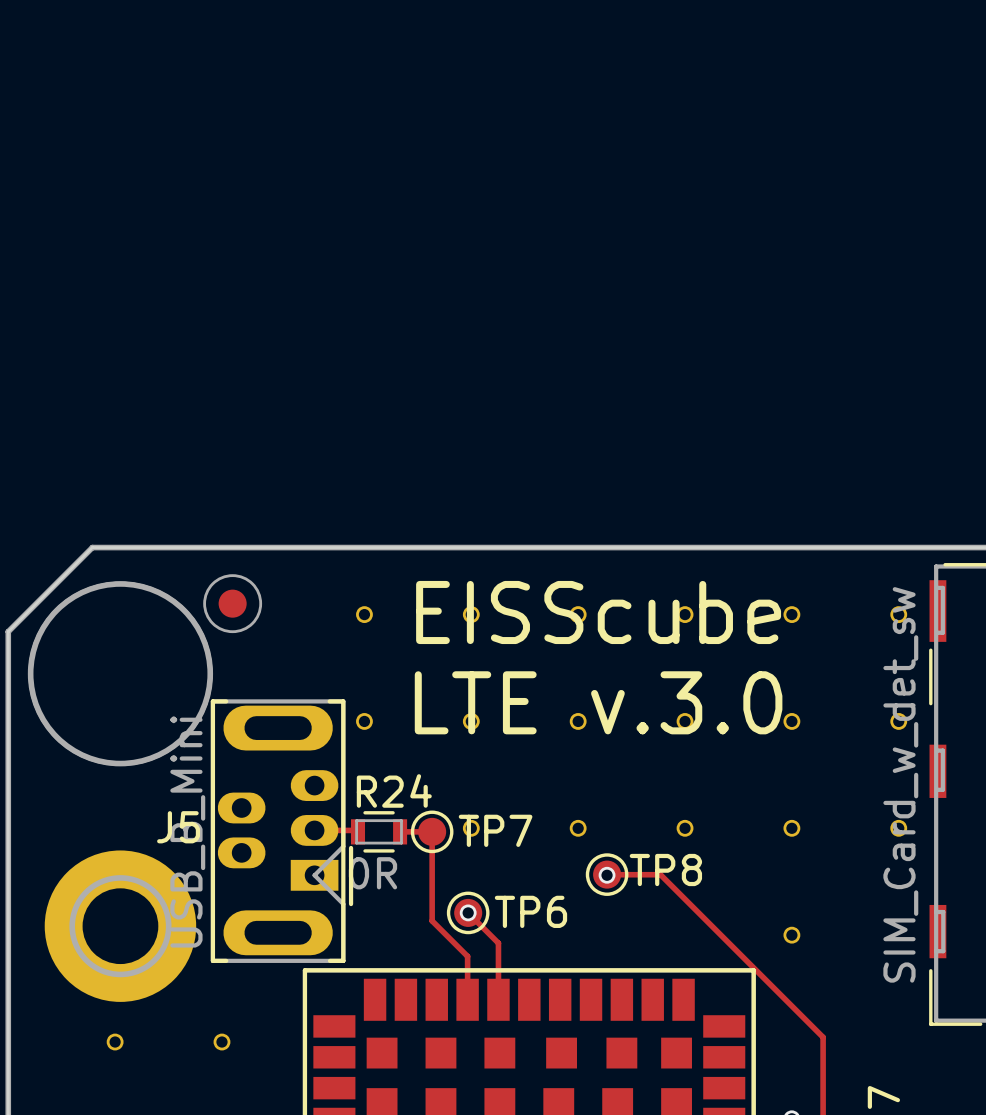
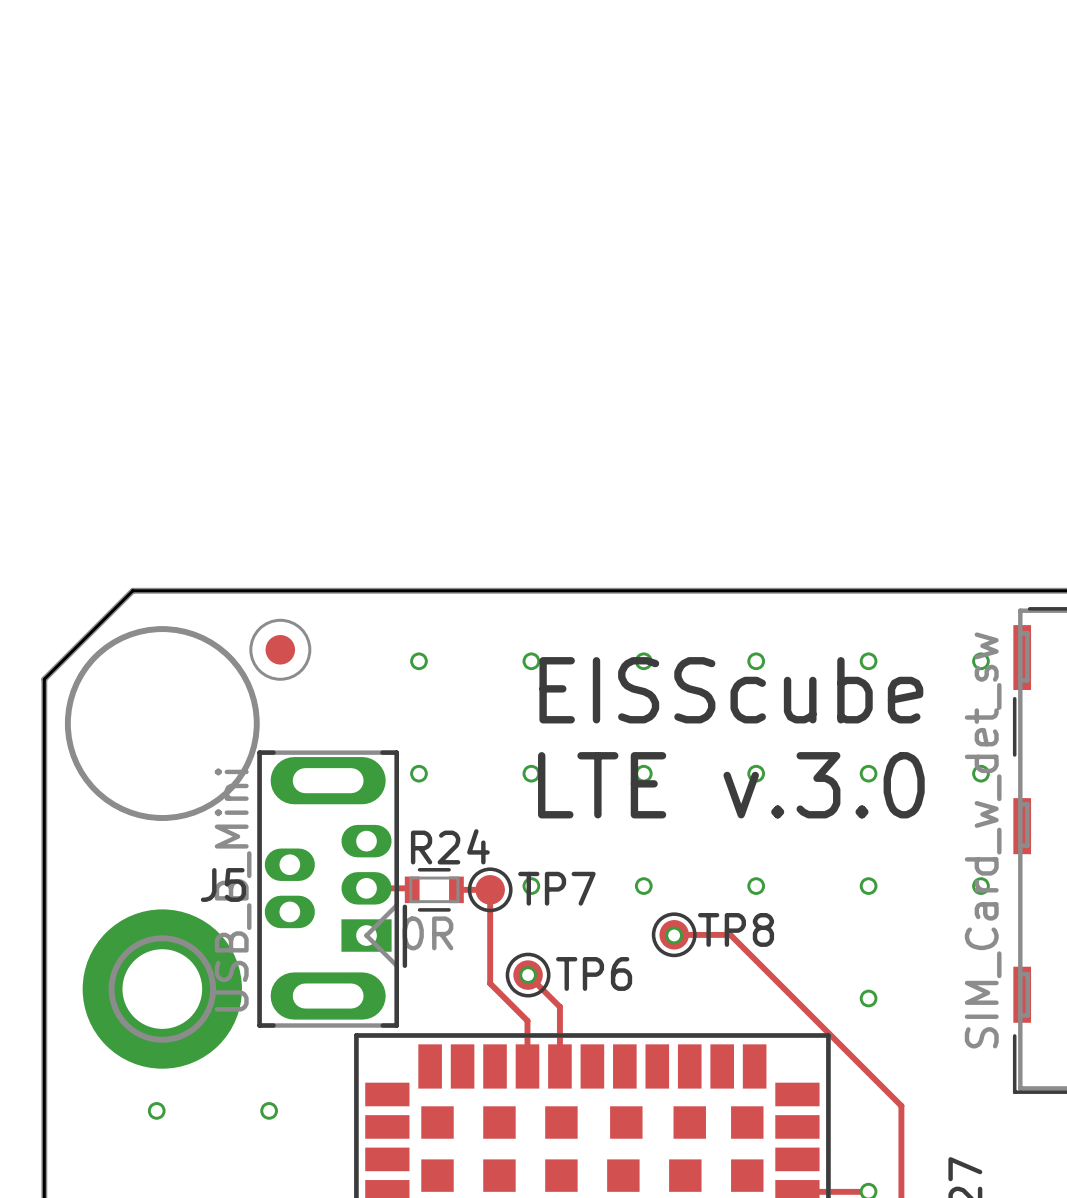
text position: EISScube (598, 612) -> EISScube (731, 690)
text position: LTE v.3.0 (598, 702) -> LTE v.3.0 (731, 785)

